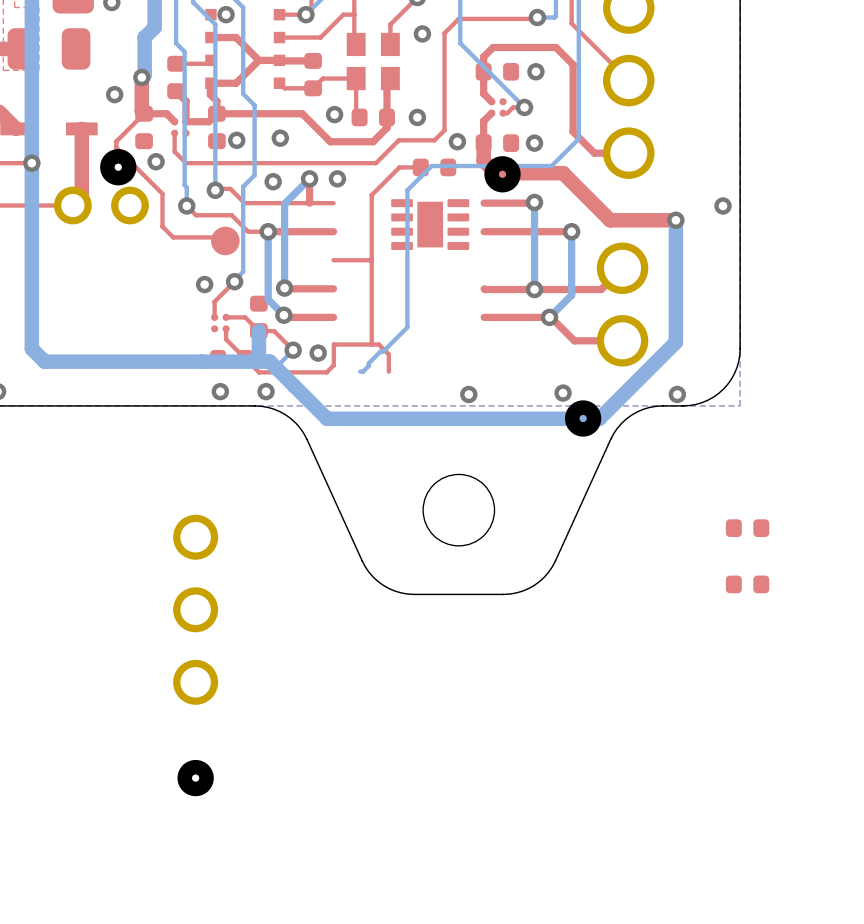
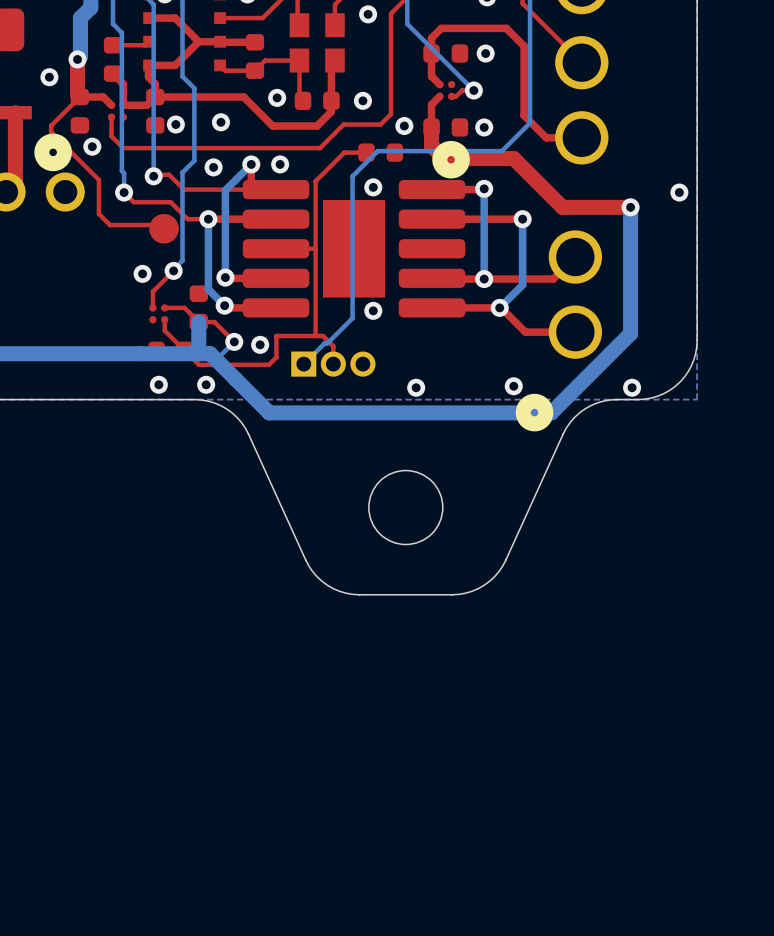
via: none -> (373, 187)
part: (430, 224) -> none
part: none -> (354, 248)
via: none -> (373, 310)
part: none -> (333, 364)
part: (747, 528) -> none
part: (747, 584) -> none
part: (195, 655) -> none

